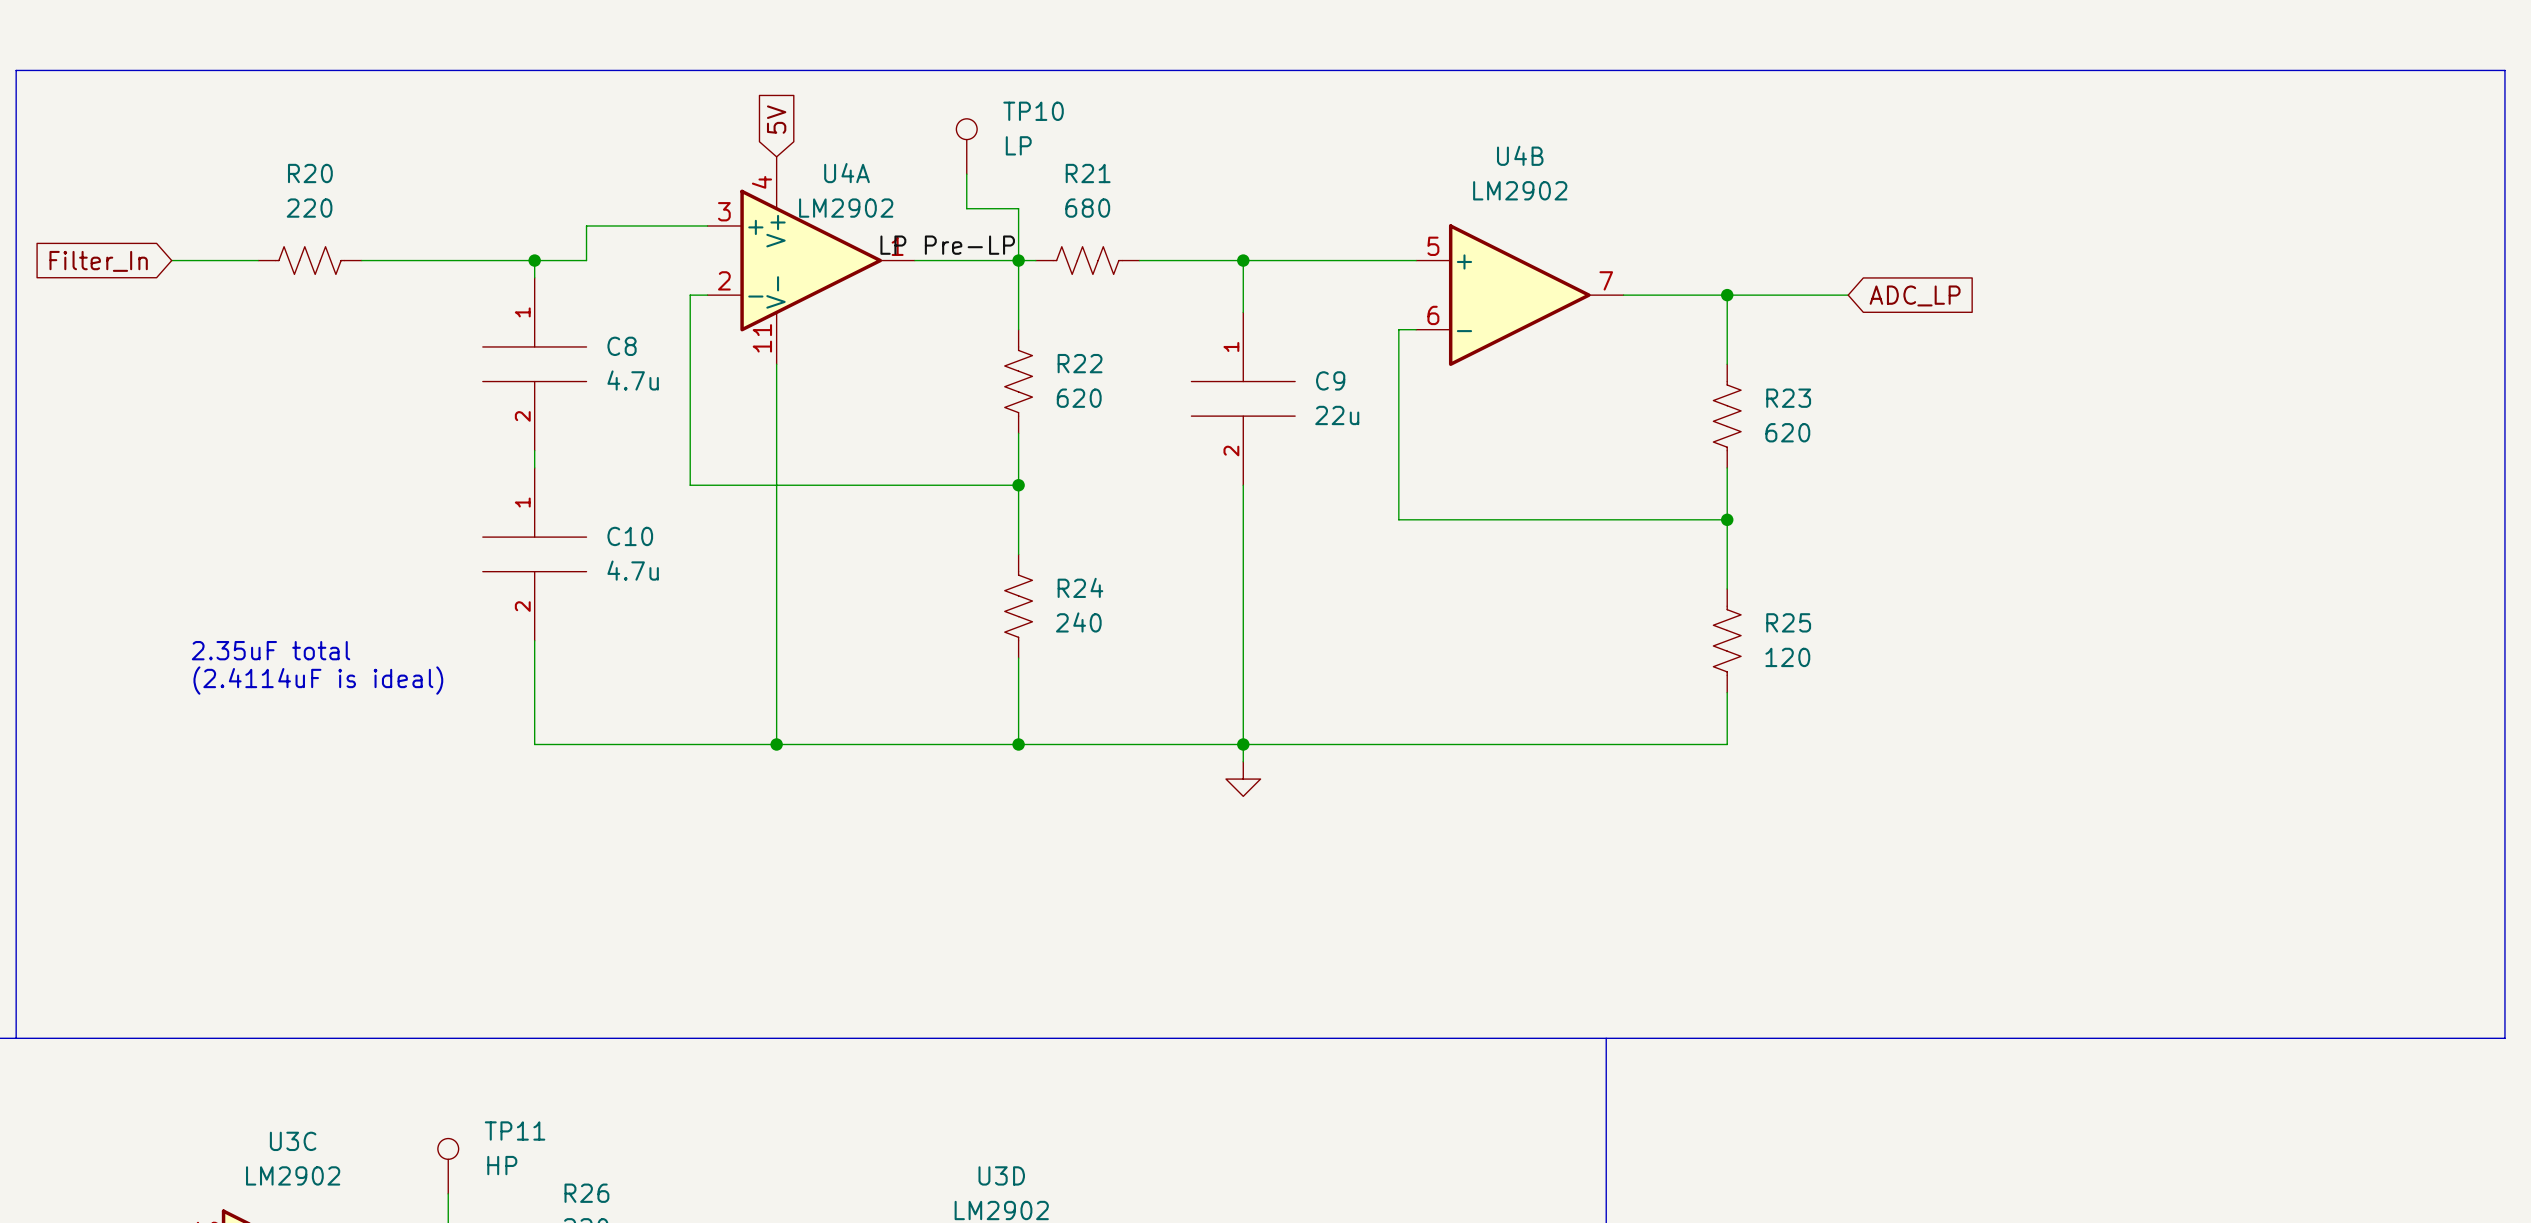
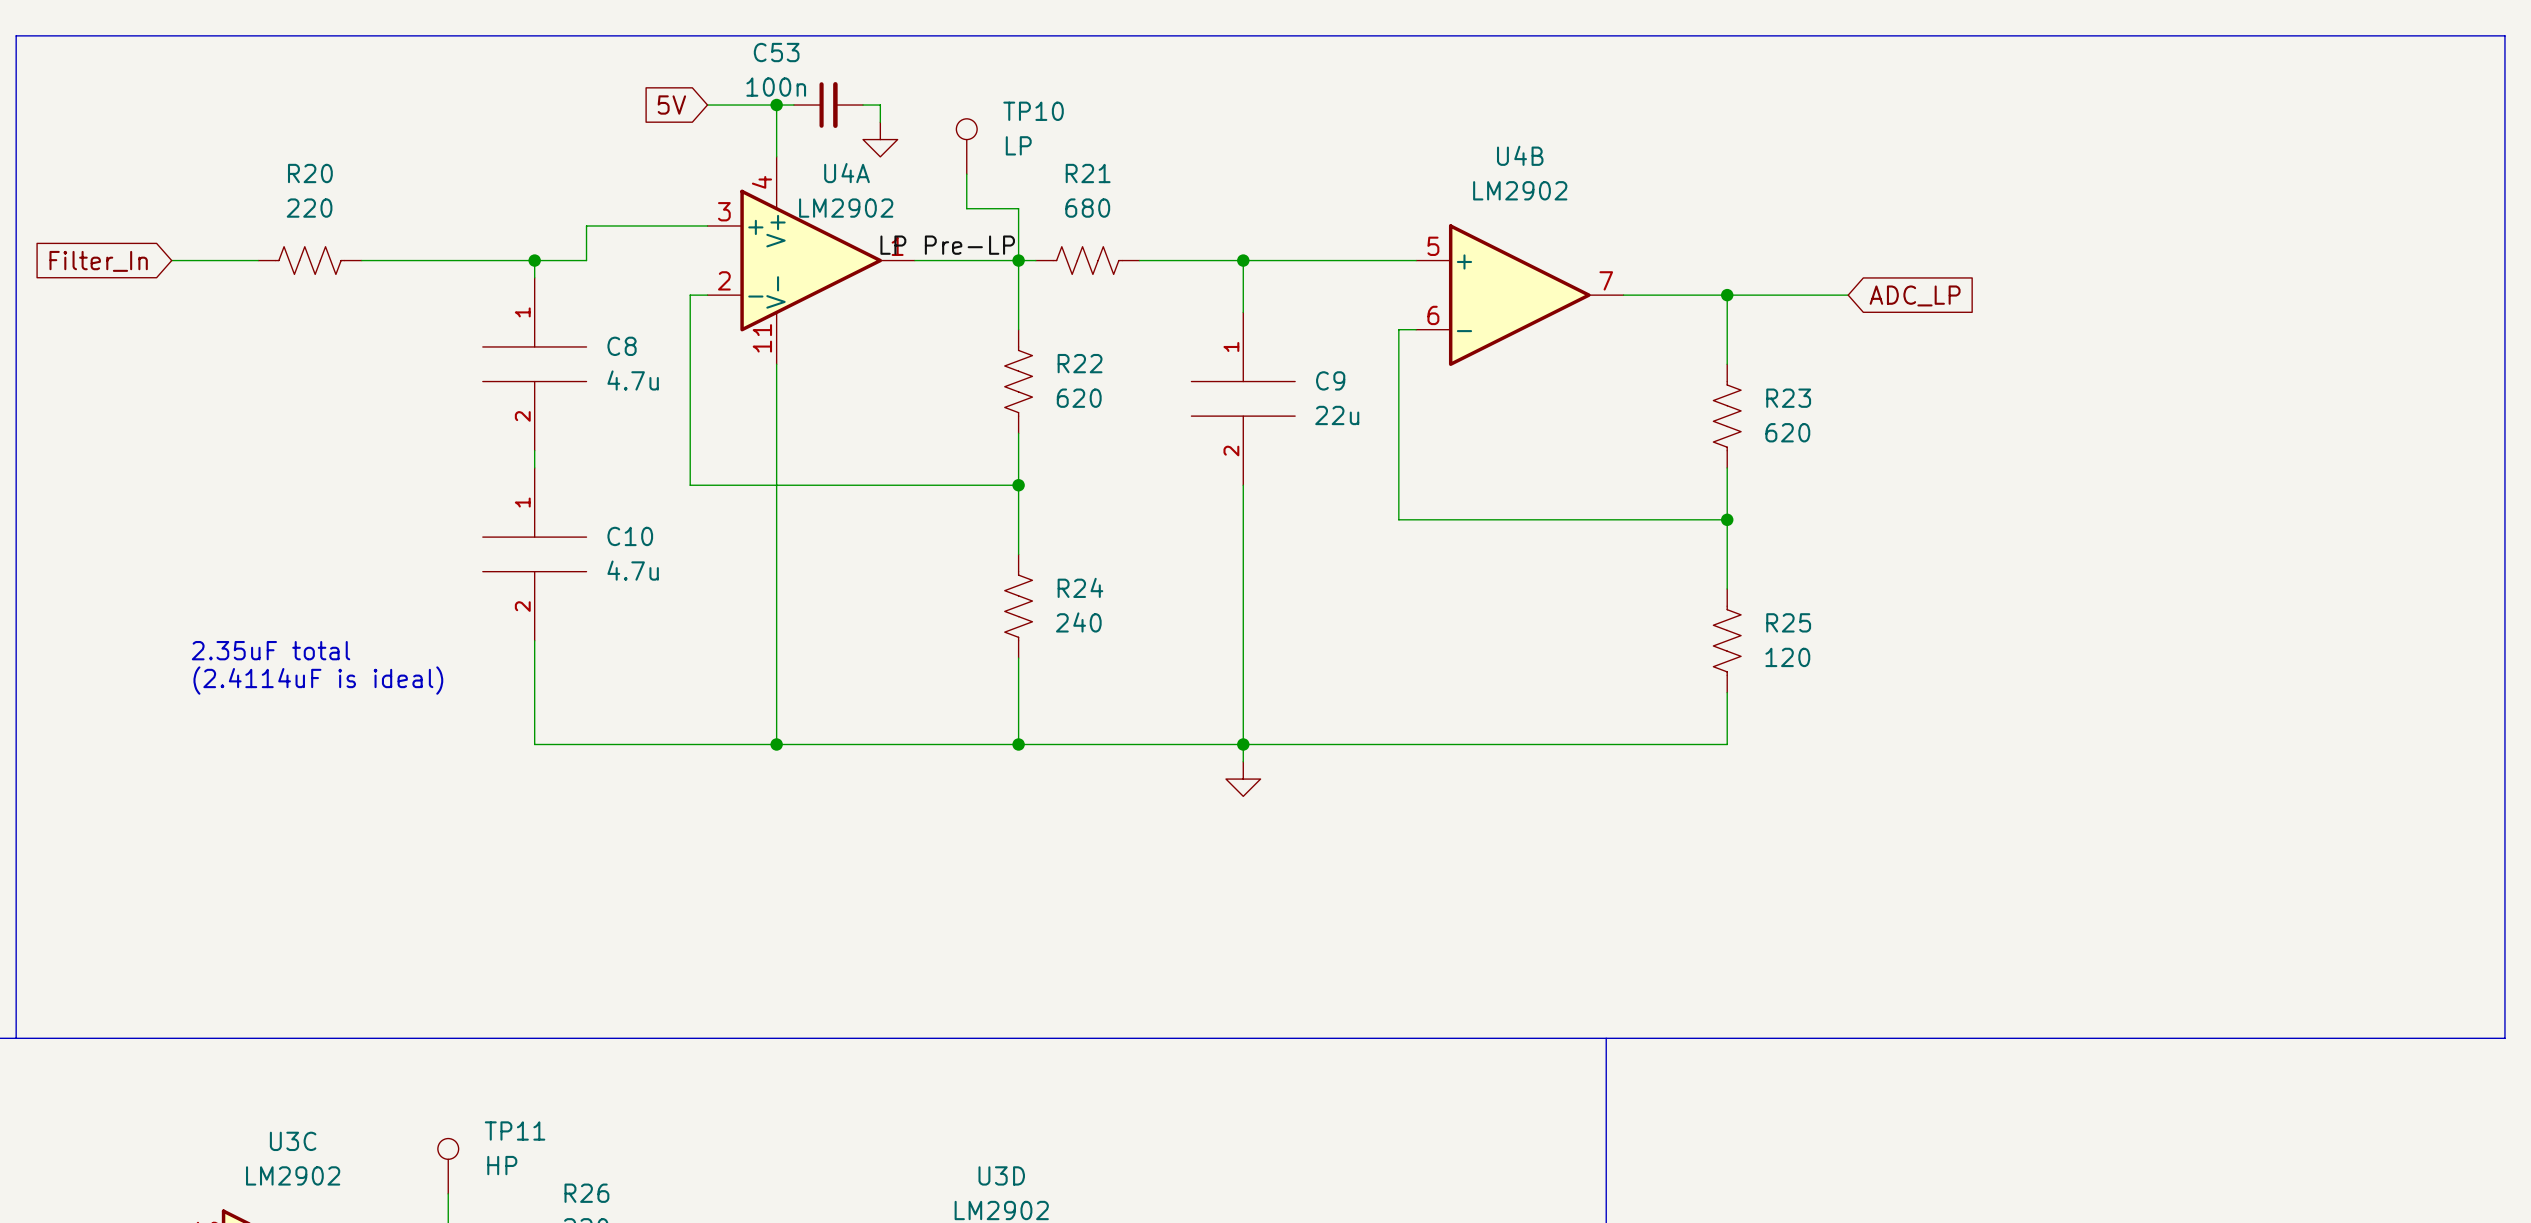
line: (16, 70) (2504, 70) -> (16, 70) (16, 35) (2504, 35) (2504, 70)
wire: none -> (707, 105) (793, 105)
wire: none -> (776, 105) (776, 156)
junction: none -> (776, 105)
C53: none -> 100n (828, 105)
wire: none -> (863, 105) (880, 105) (880, 122)
global label rotation: 0° (776, 119) -> 90° counterclockwise (671, 105)
global label position: 5V (776, 119) -> 5V (671, 105)
power symbol: none -> (880, 139)

